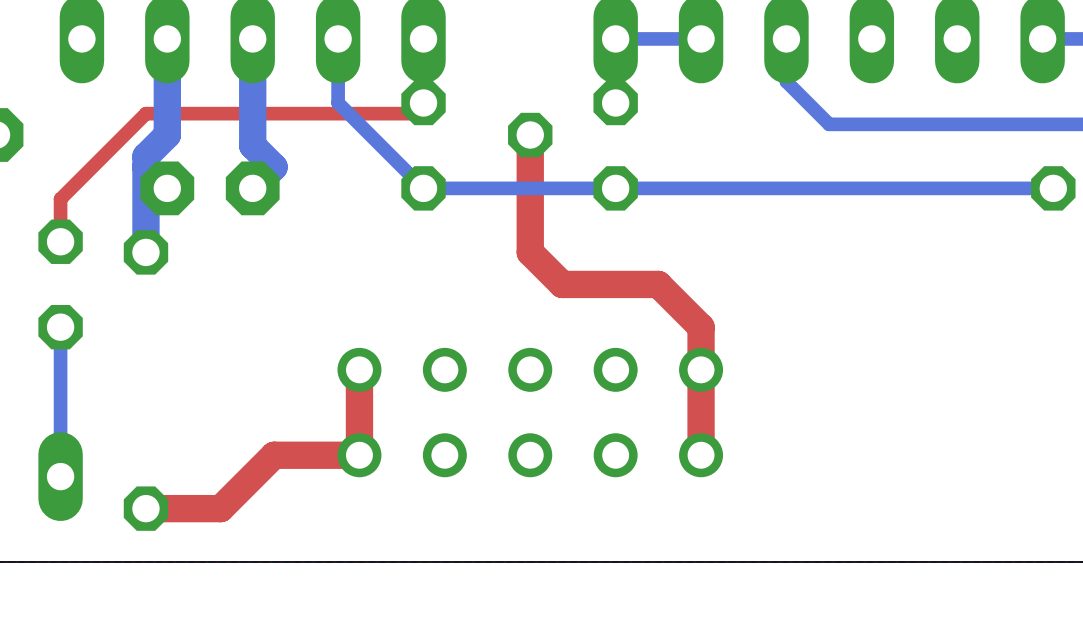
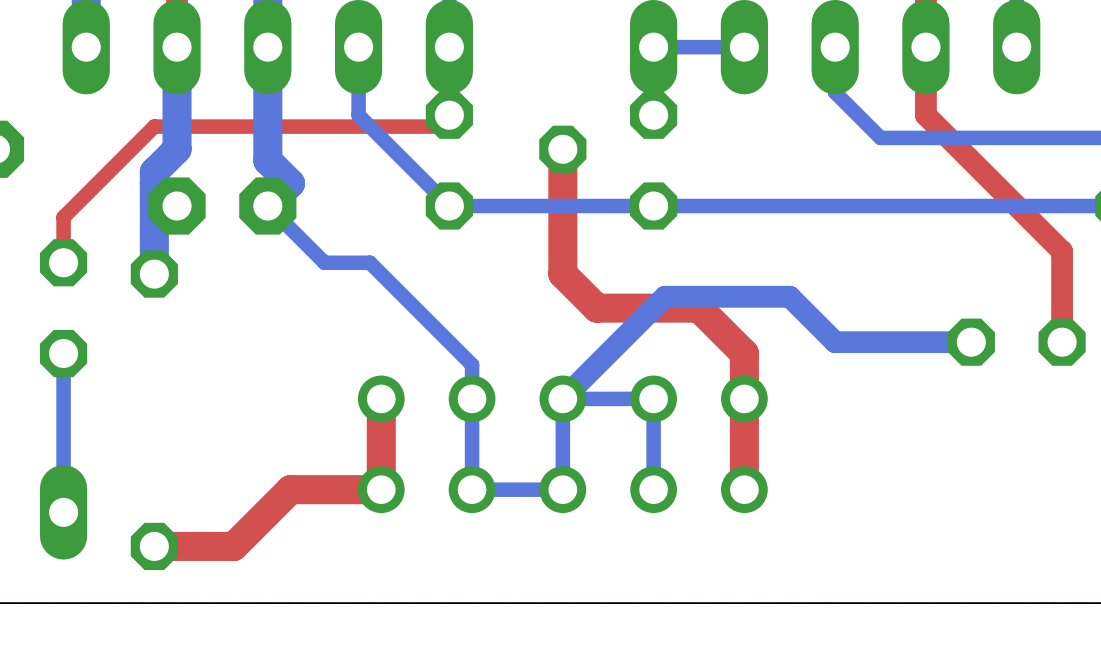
top track: none -> (925, 47) (925, 115) (1062, 251) (1062, 342)
bottom track: none -> (267, 206) (324, 262) (369, 262) (472, 364) (472, 489) (562, 489) (562, 398)
bottom track: none -> (971, 342) (835, 342) (789, 296) (664, 296) (562, 398)
part: none -> (1016, 342)
bottom track: none -> (562, 398) (653, 398) (653, 489)

